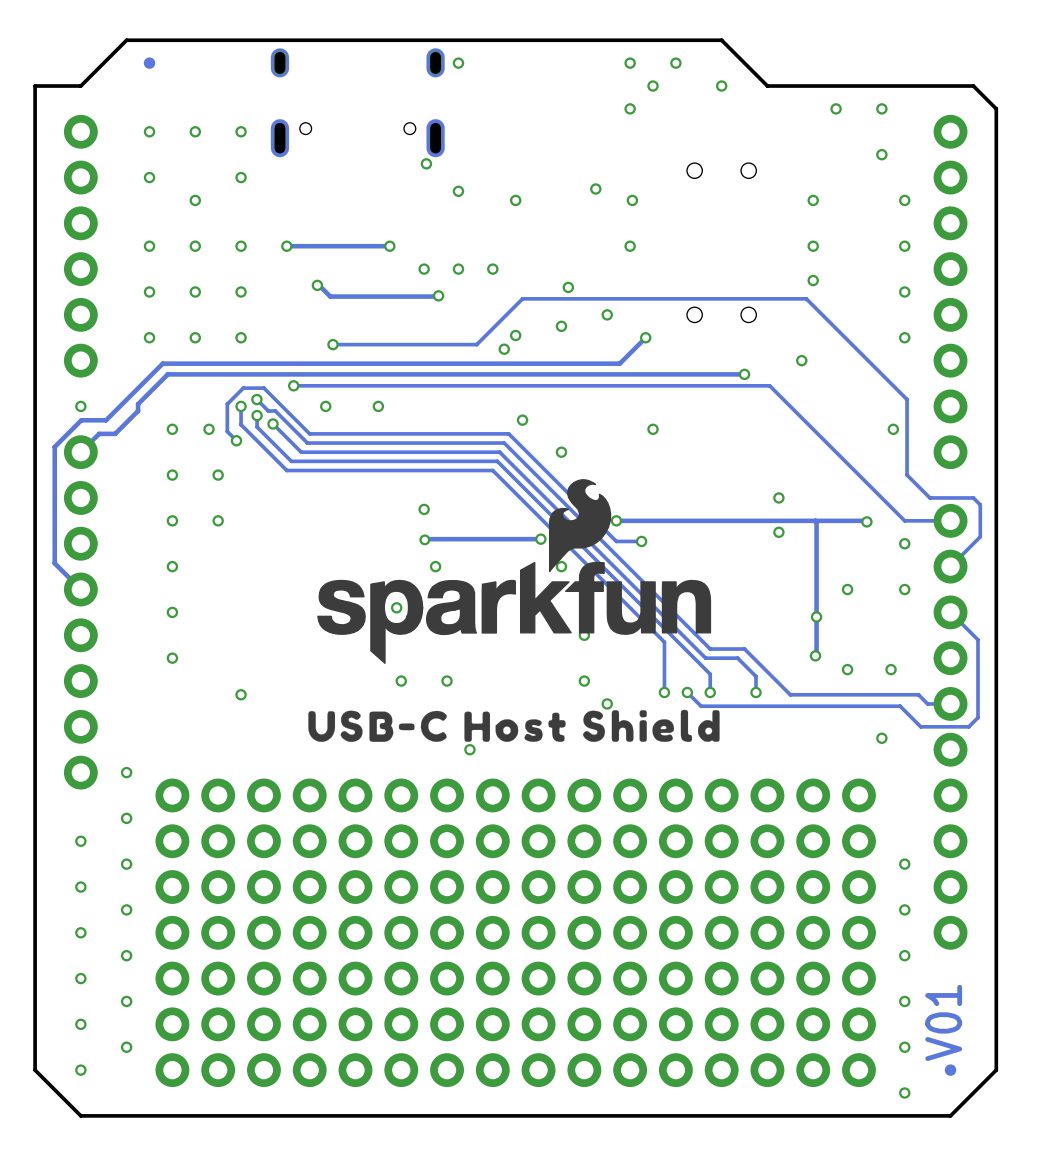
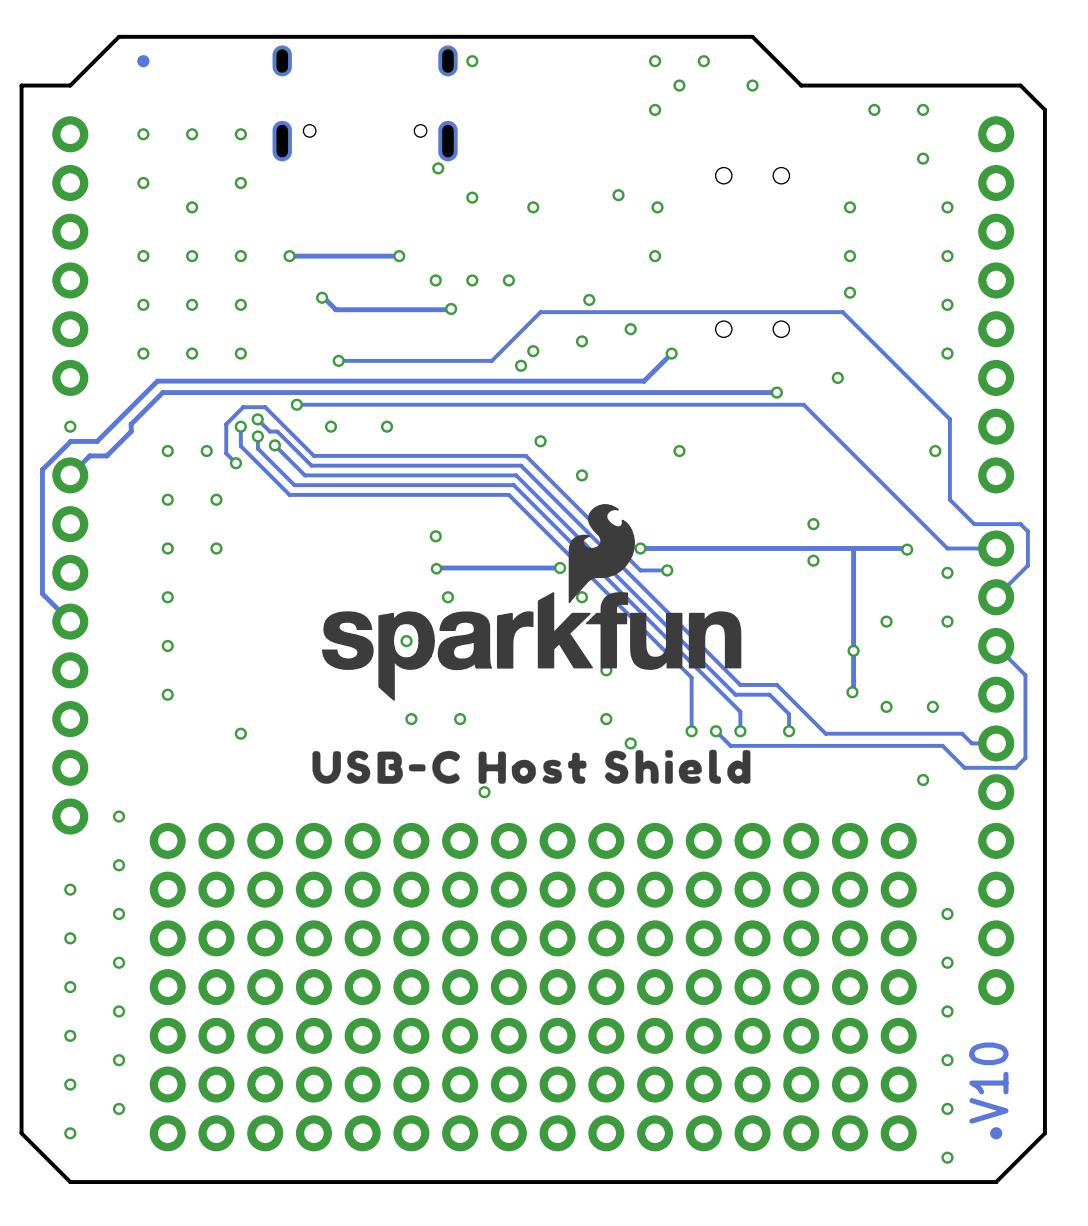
text: V01 (943, 1022) -> V10 (988, 1083)

